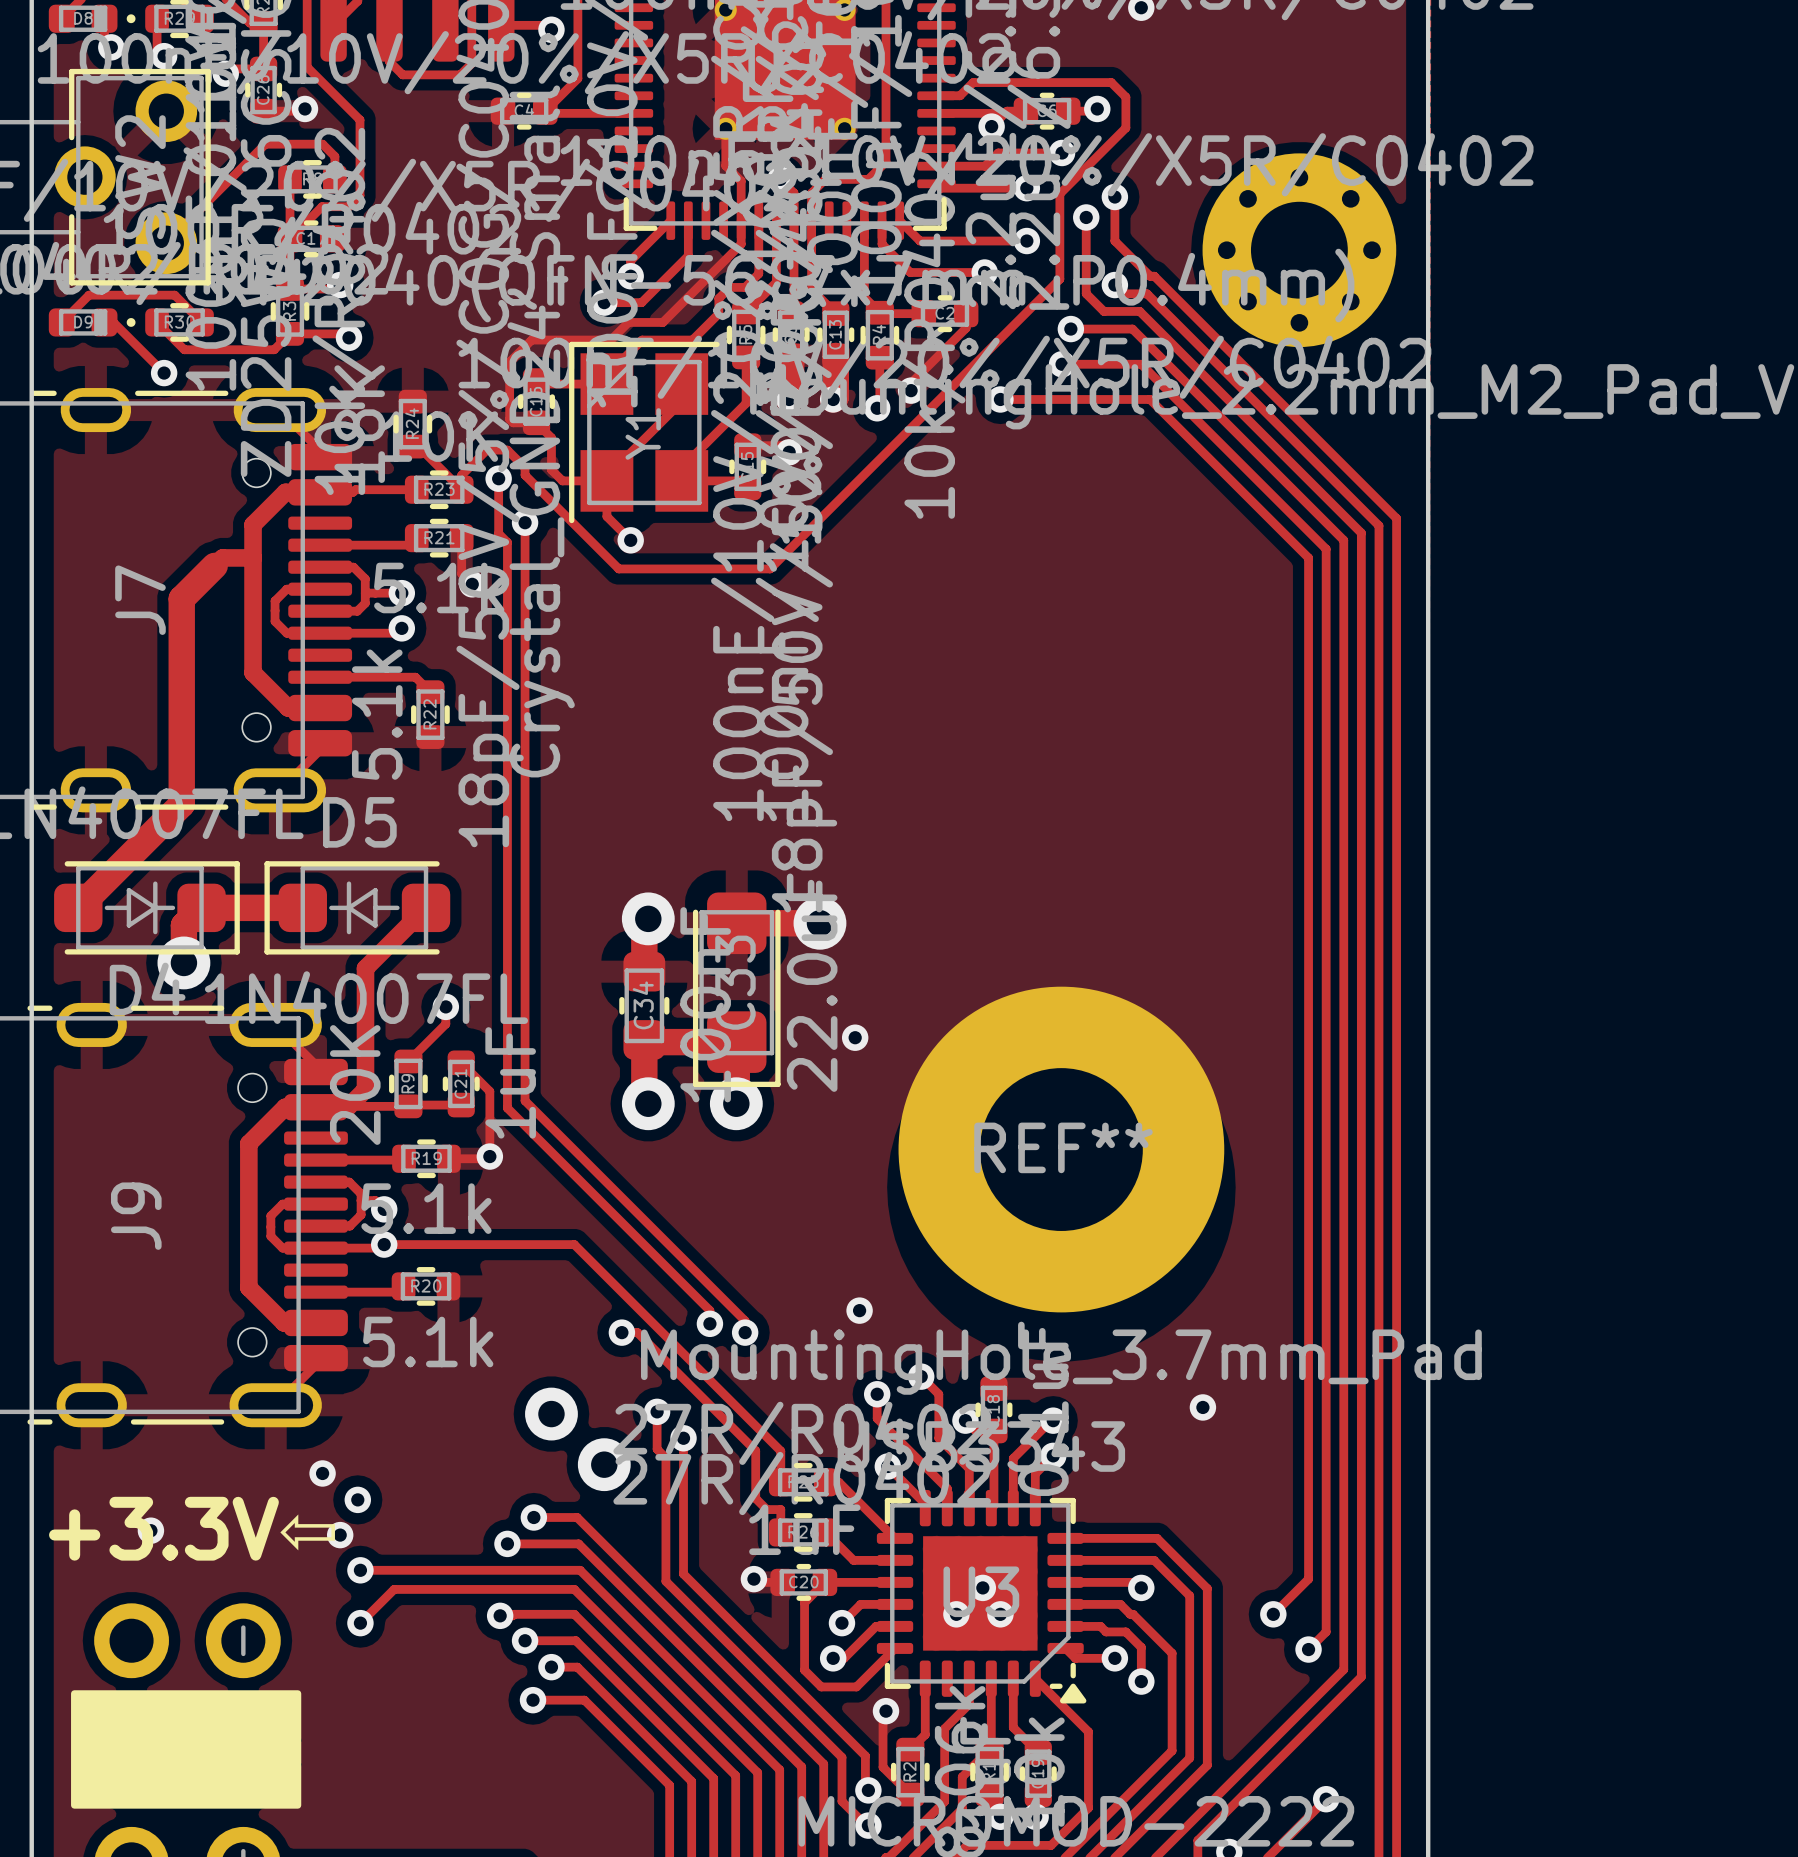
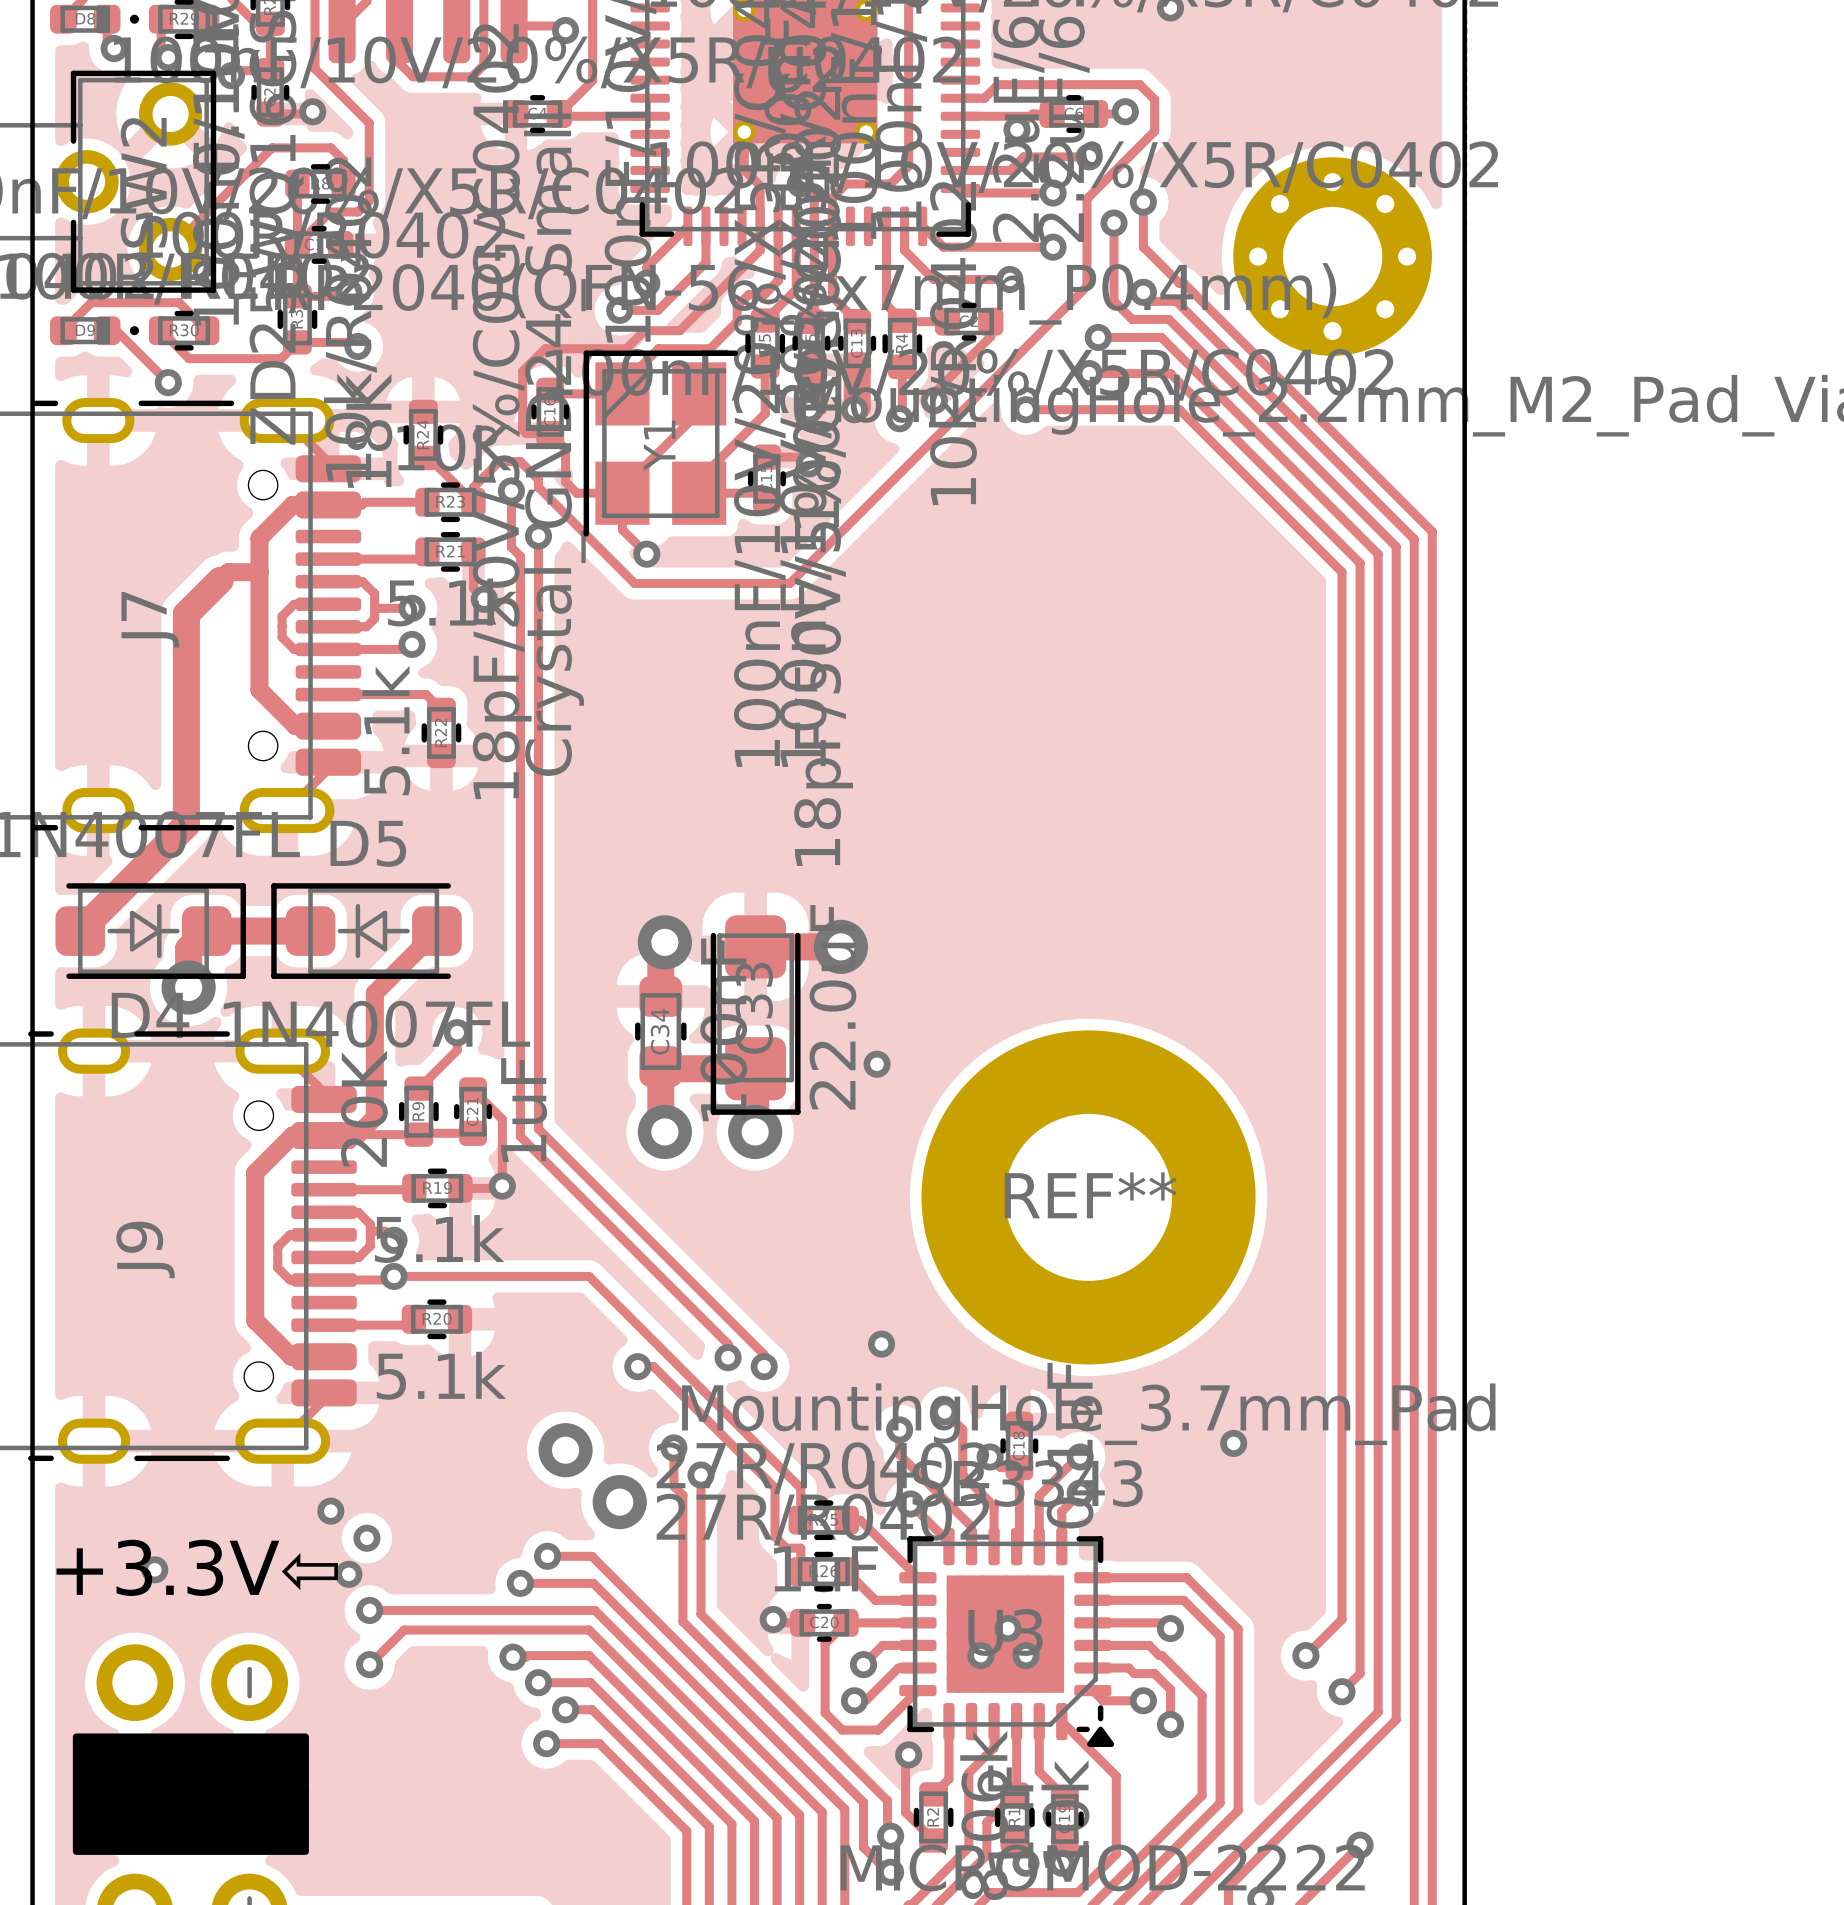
REF** position: (1061, 1149) -> (1088, 1197)

